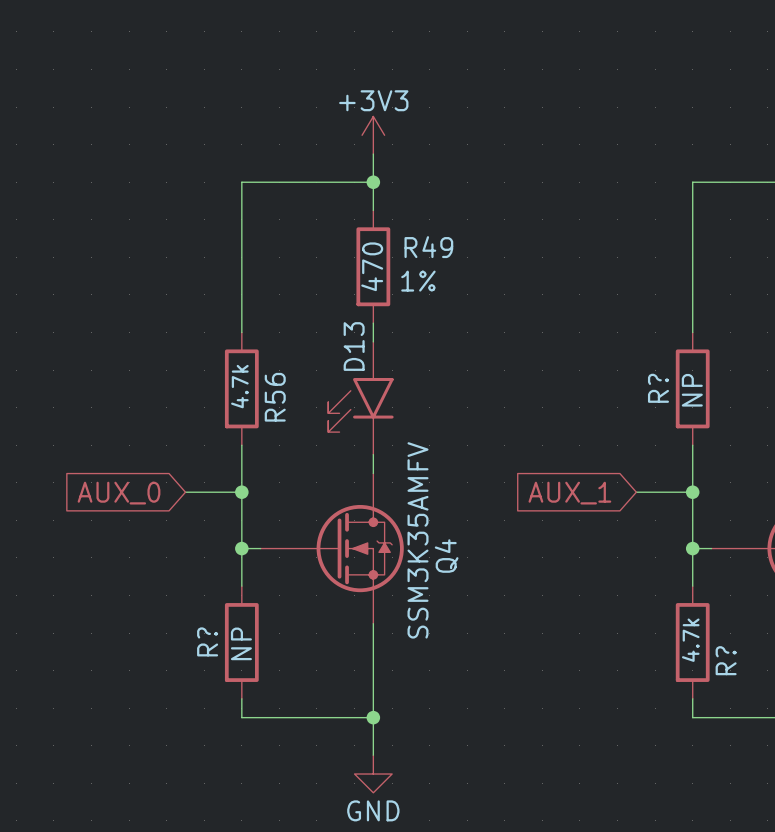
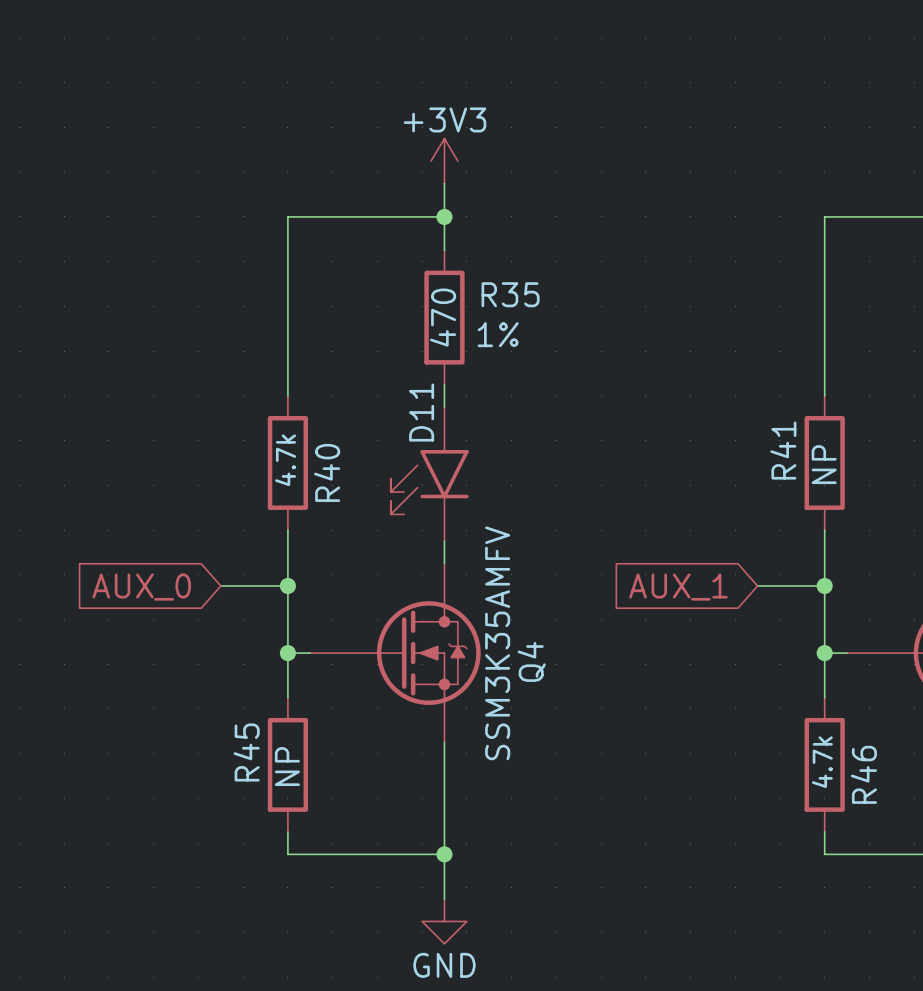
R49 name: R49 (428, 247) -> R35 (510, 294)
D13 name: D13 (354, 346) -> D11 (421, 412)
R? name: R? (658, 388) -> R41 (783, 450)
R56 name: R56 (275, 397) -> R40 (327, 472)
R? name: R? (207, 641) -> R45 (246, 752)
R? name: R? (726, 660) -> R46 (863, 774)

